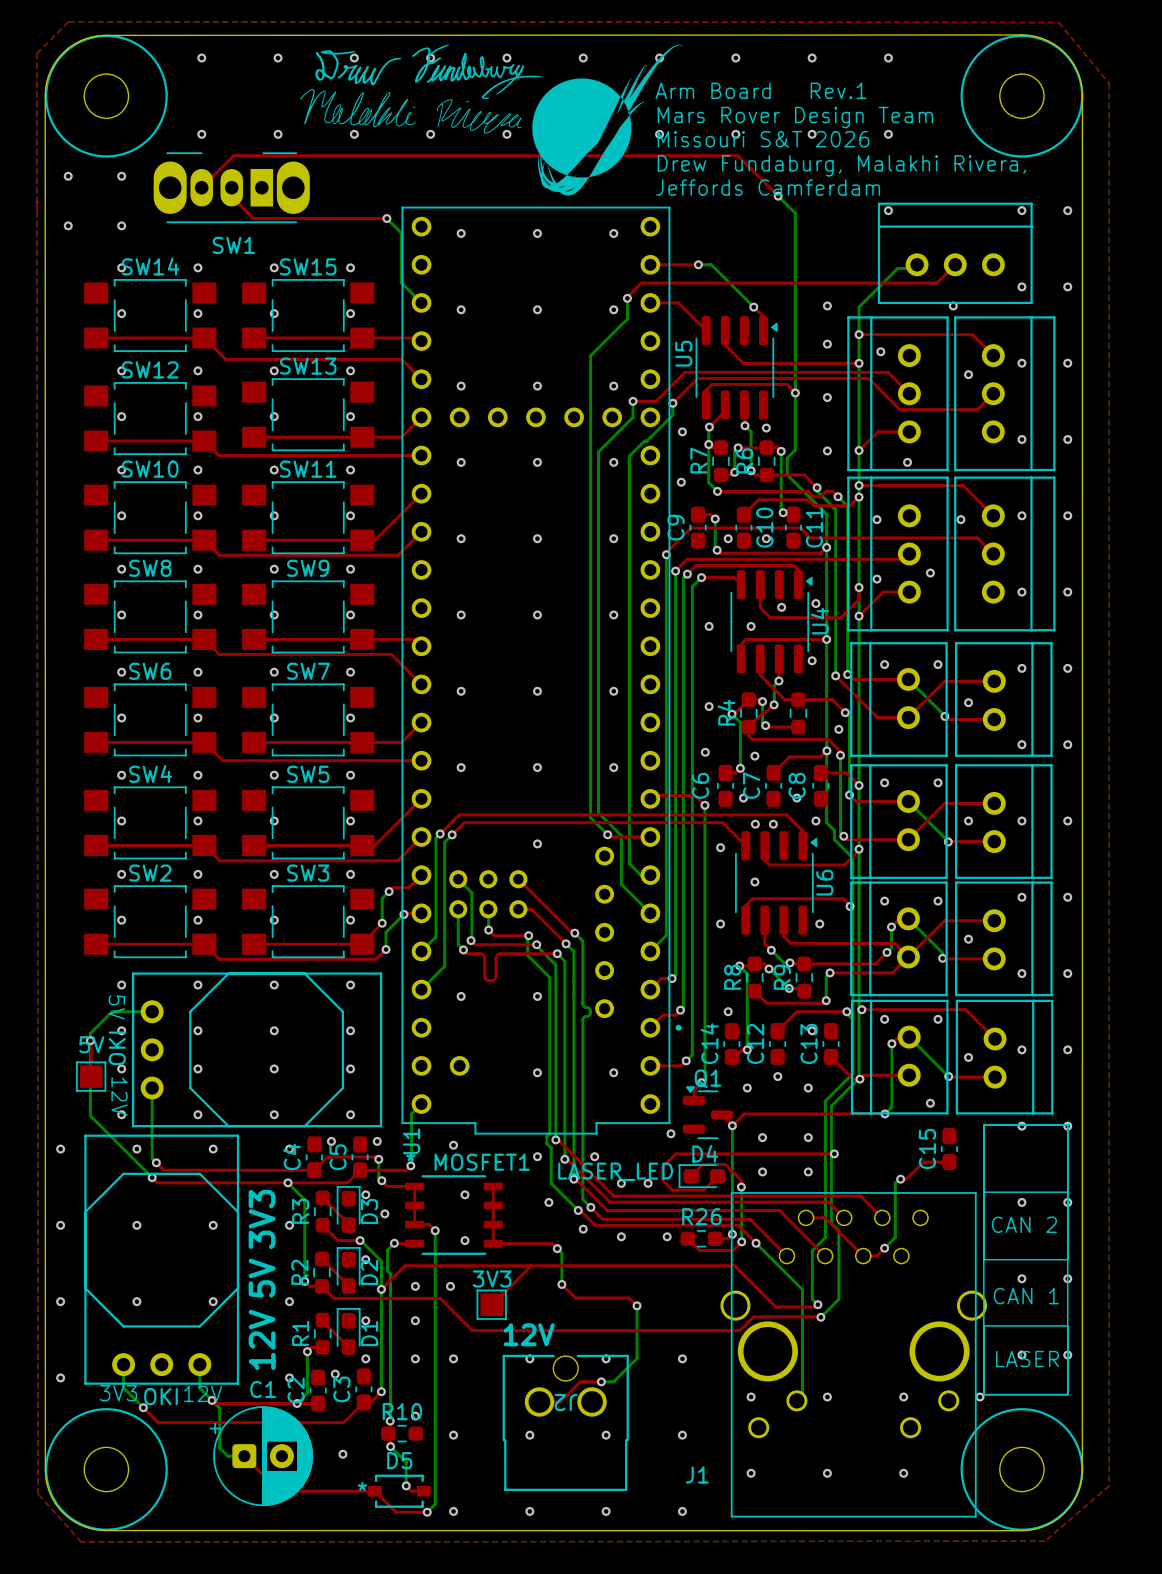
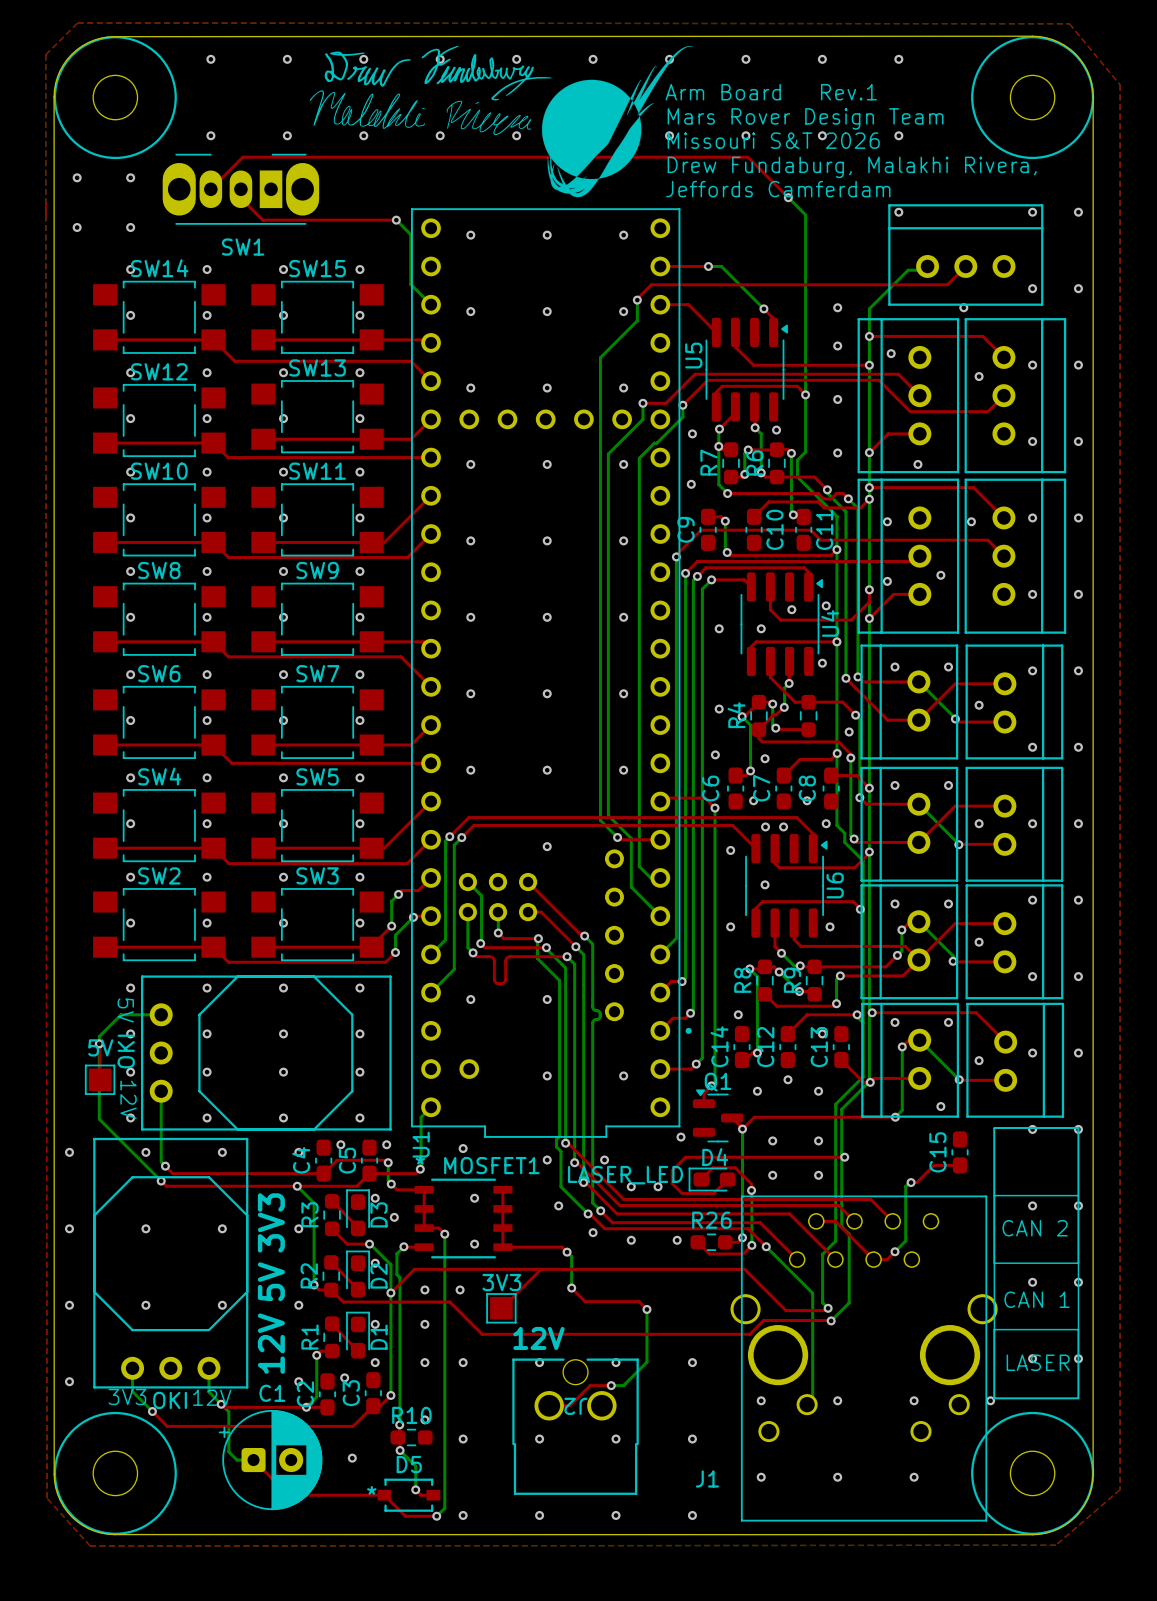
via: (728, 538) -> none
via: (766, 538) -> none

